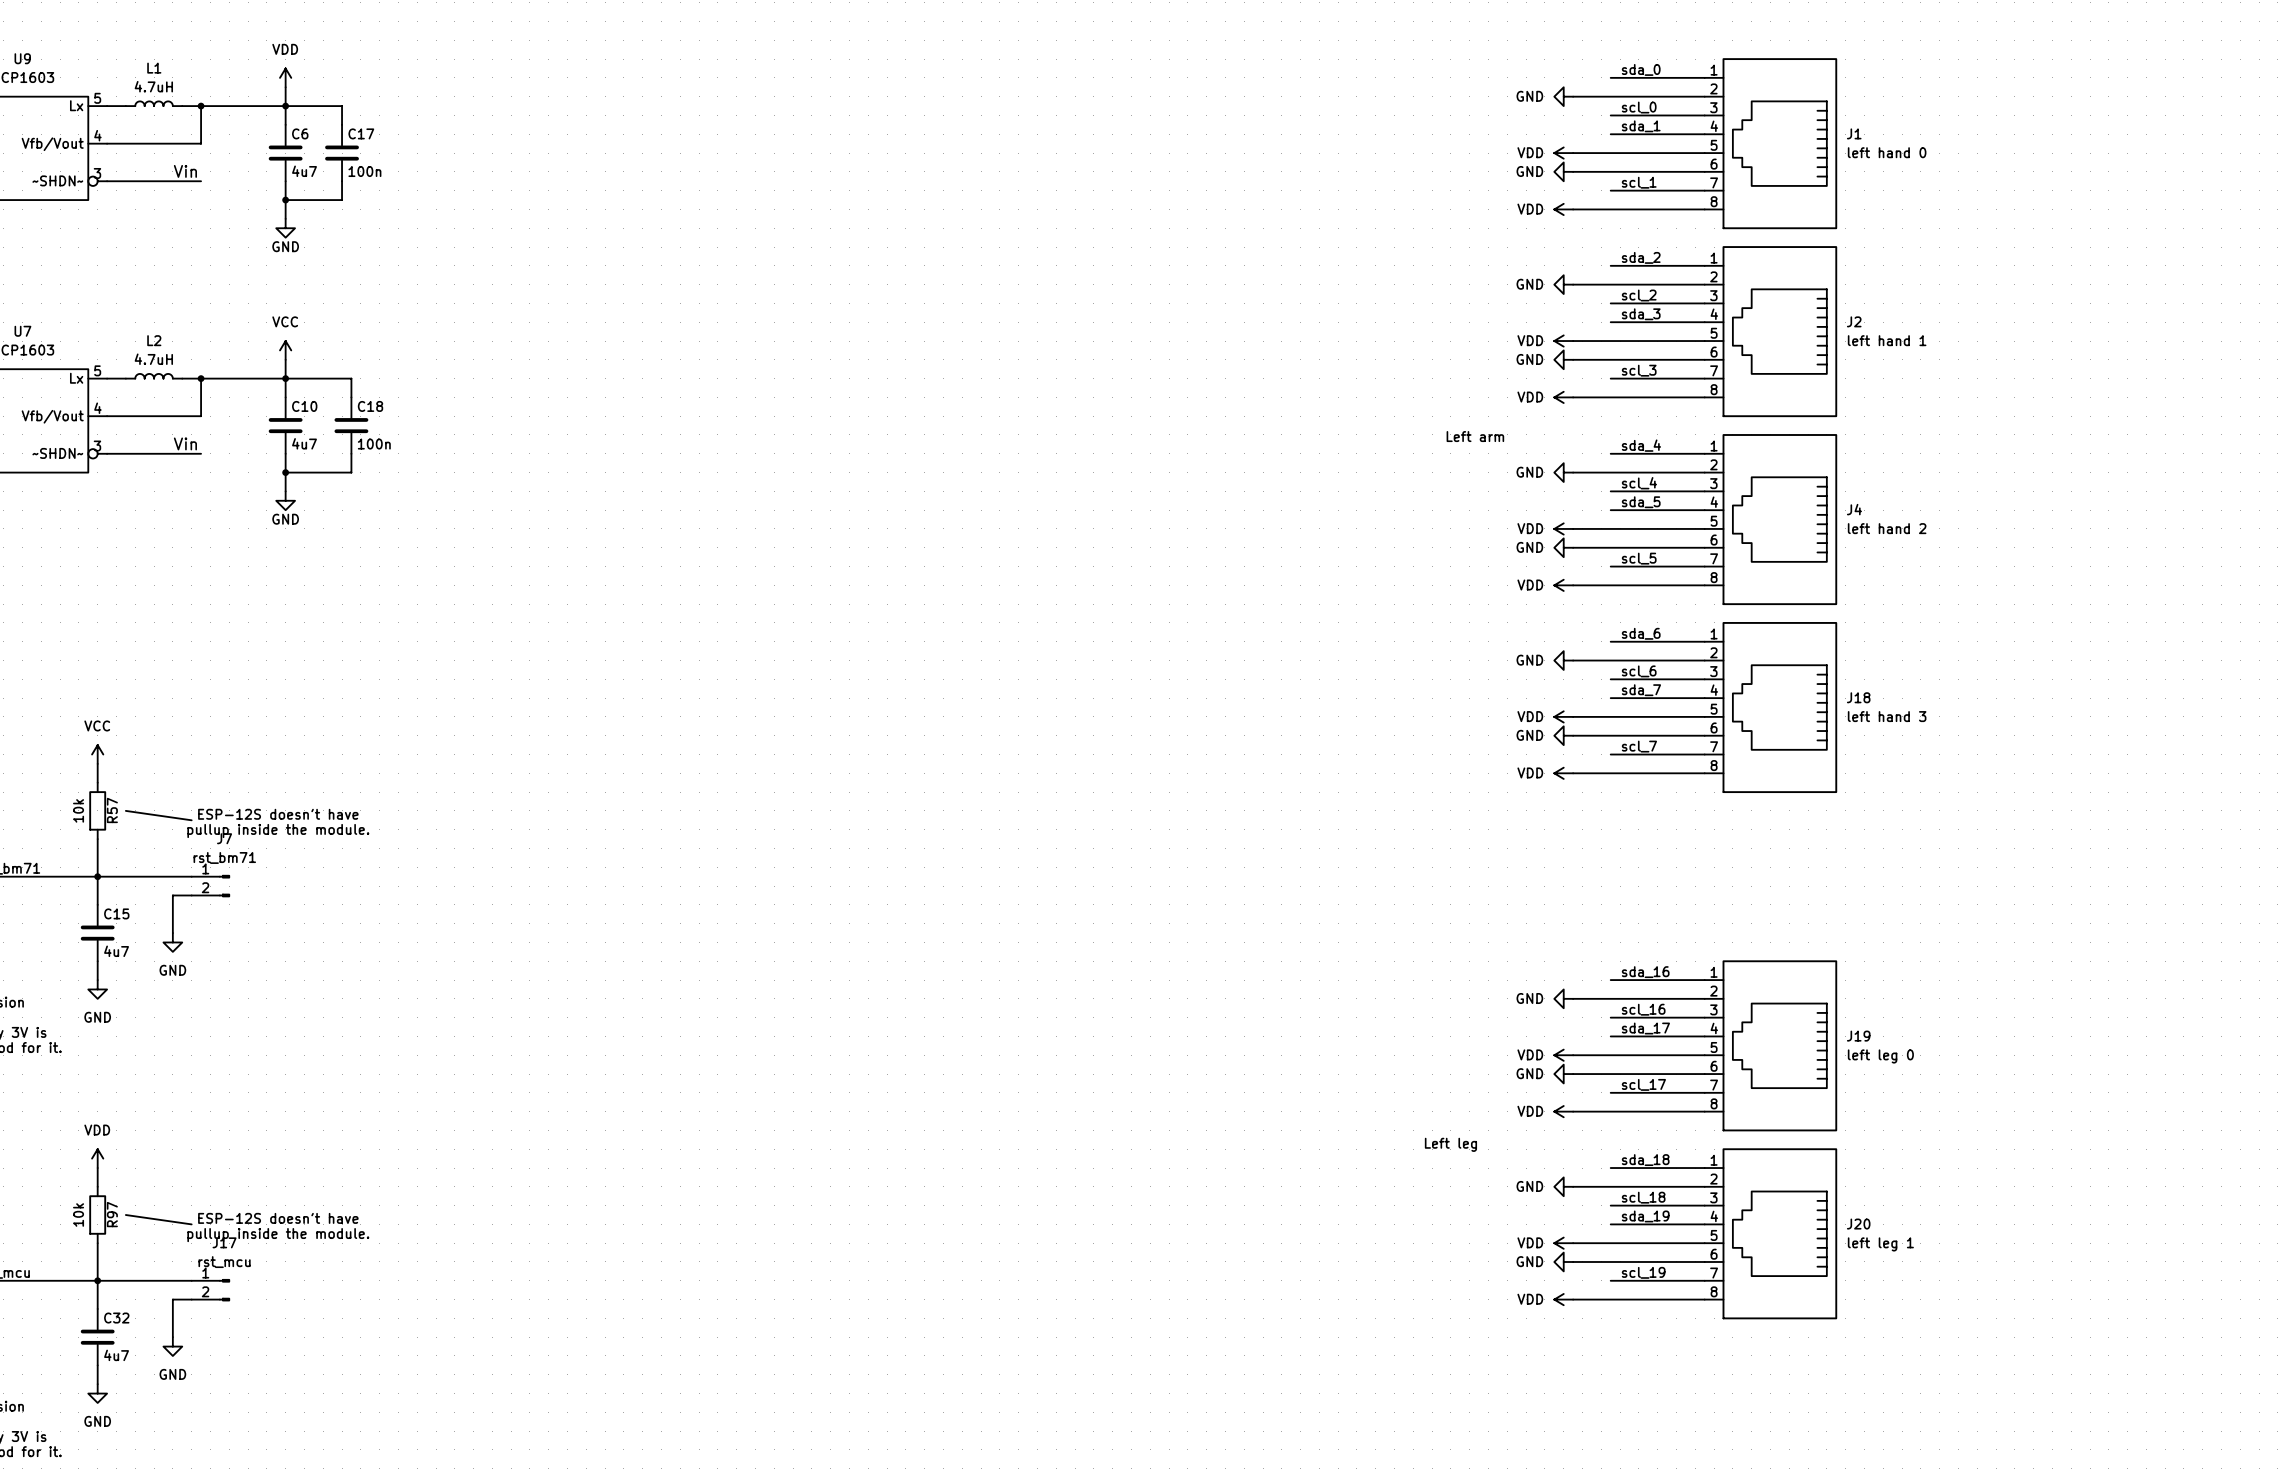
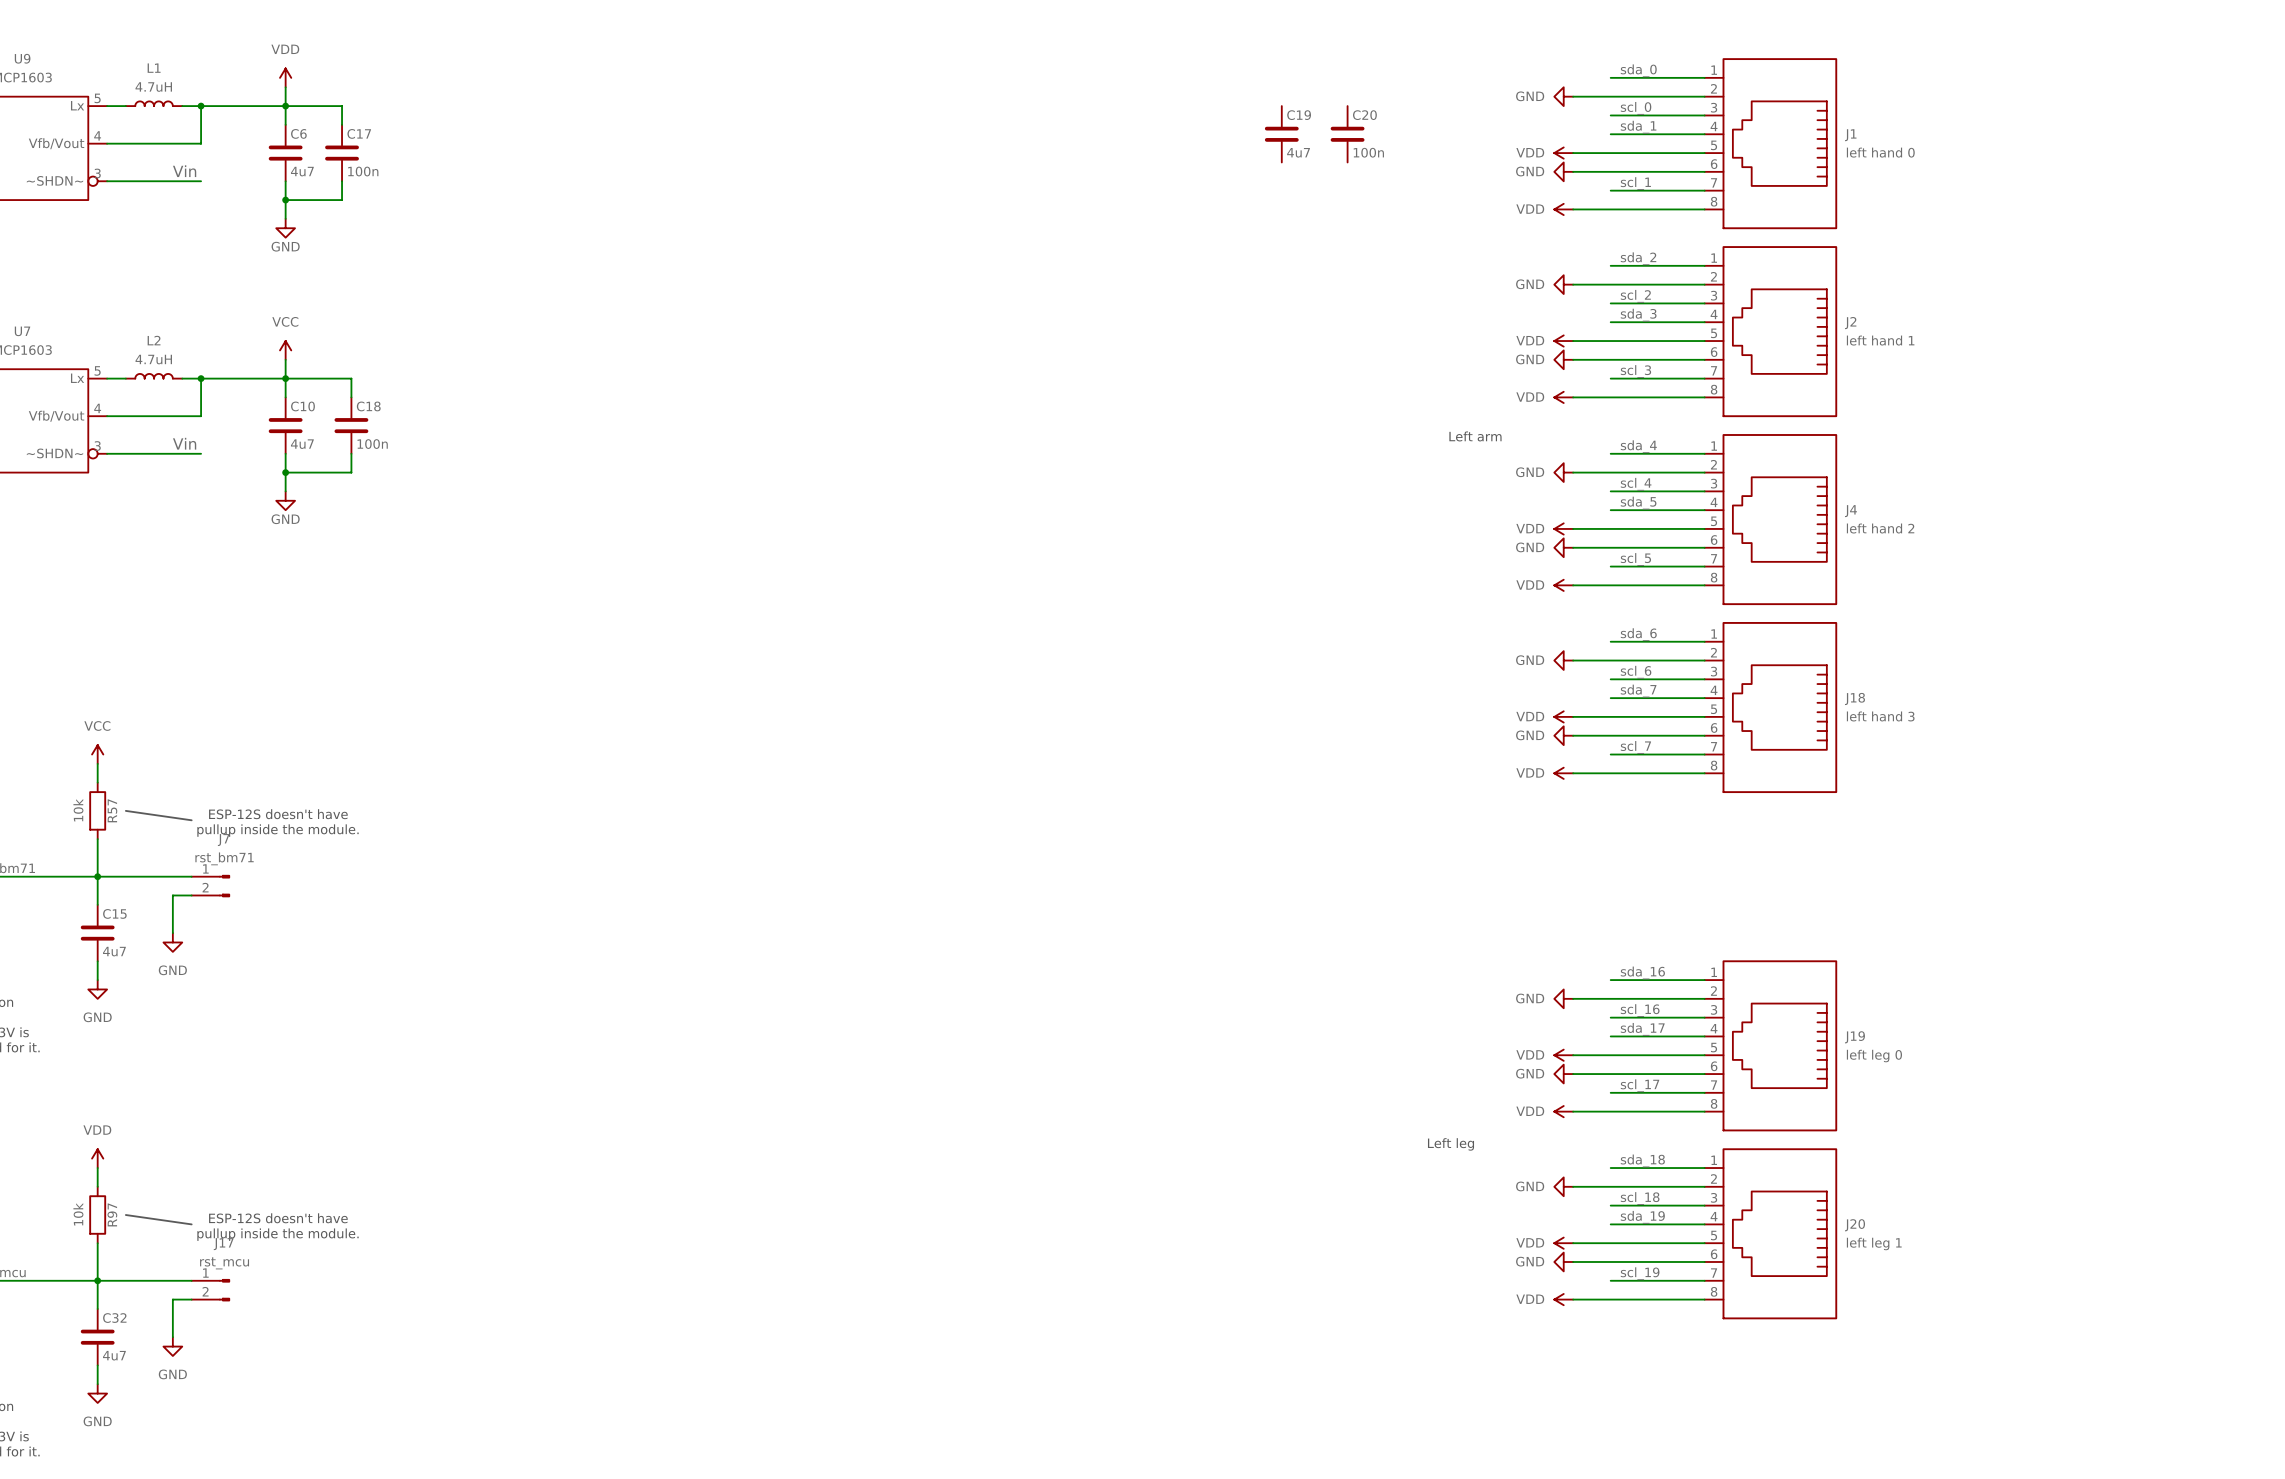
C19: none -> 4u7 (1281, 134)
C20: none -> 100n (1347, 134)

